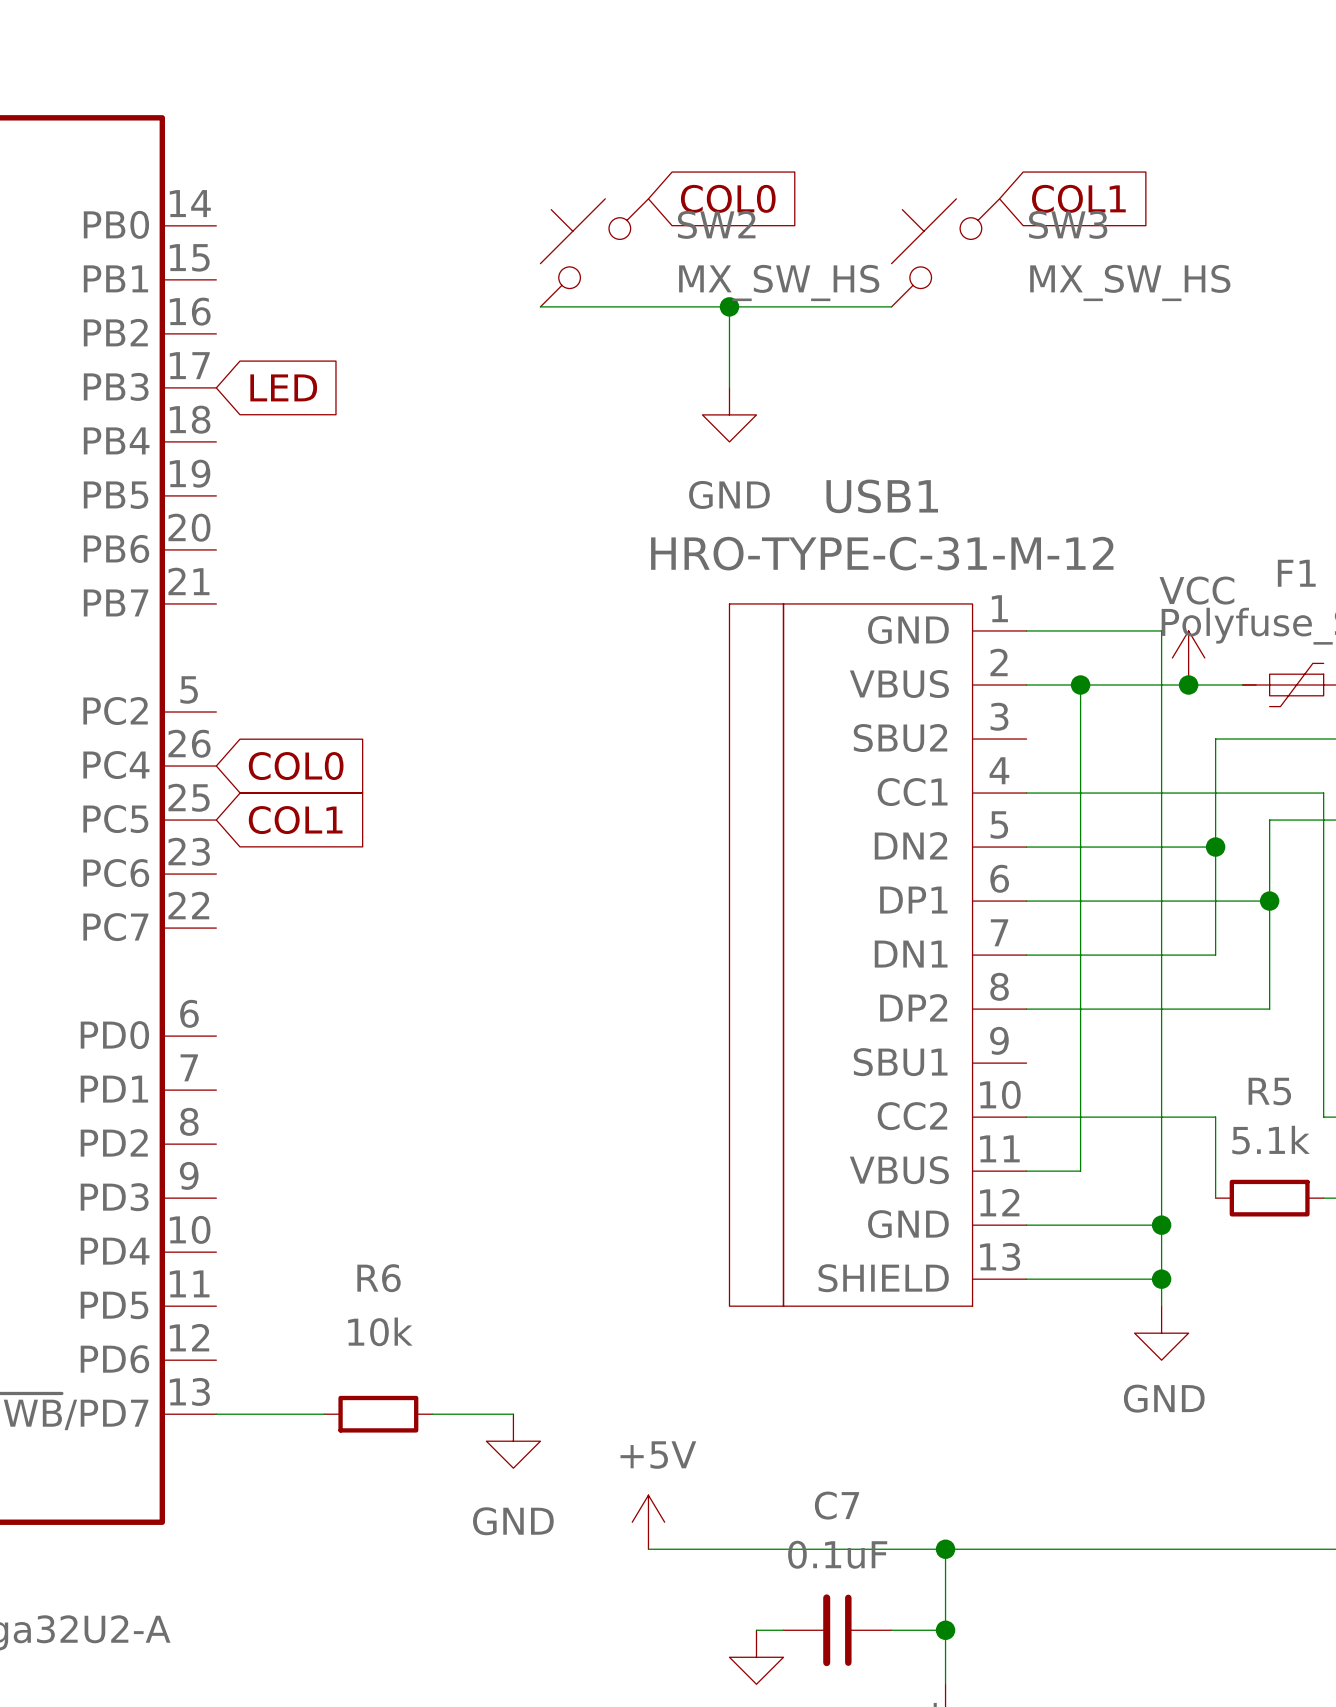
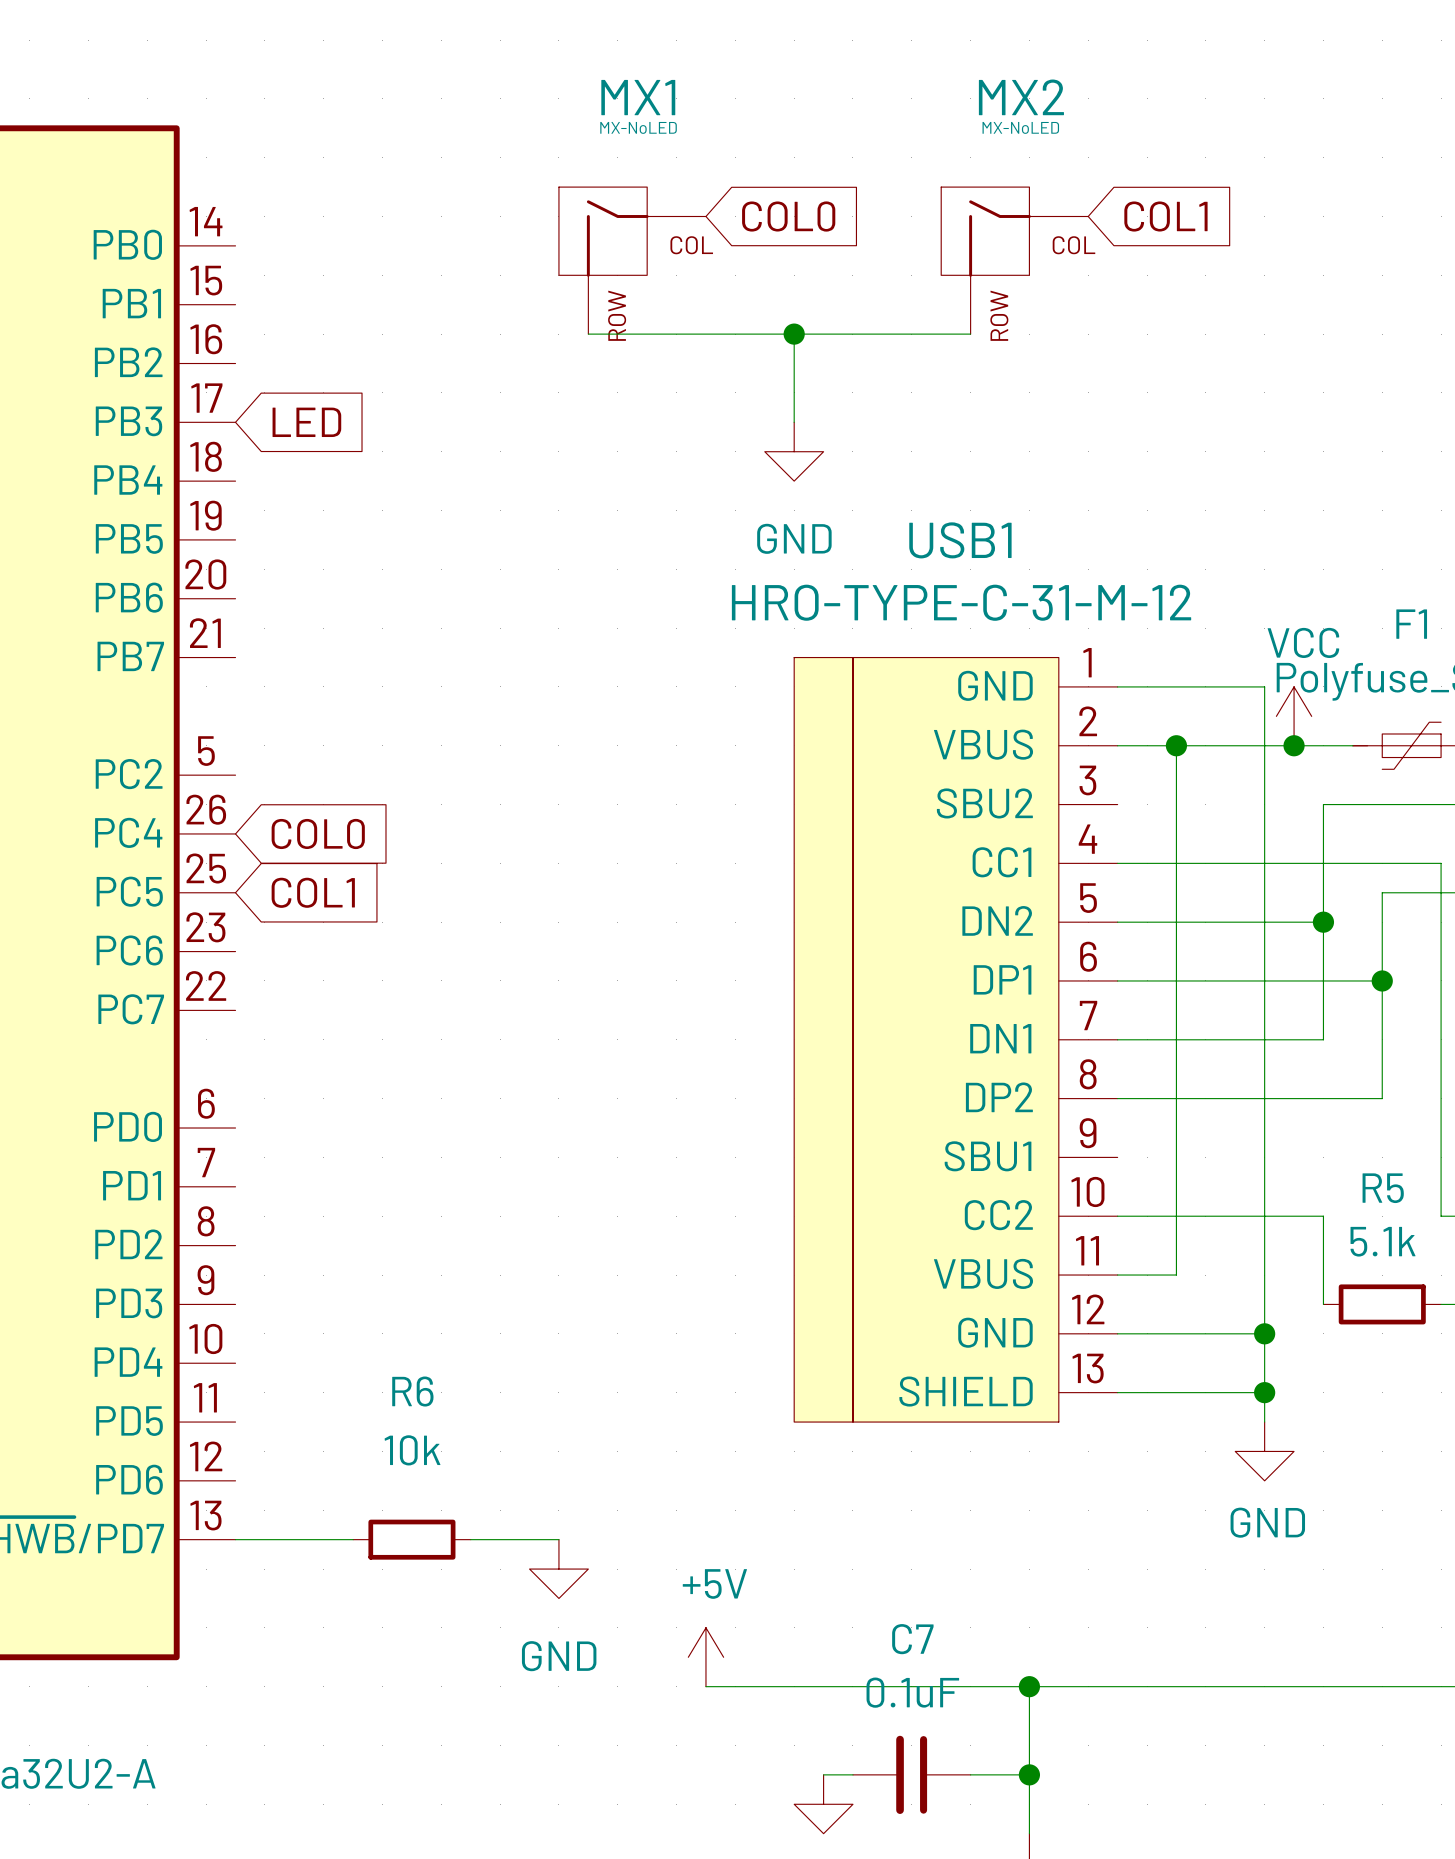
MX1: none -> MX-NoLED (632, 260)
MX2: none -> MX-NoLED (1014, 260)
SW2: MX_SW_HS (594, 252) -> none
SW3: MX_SW_HS (945, 252) -> none

